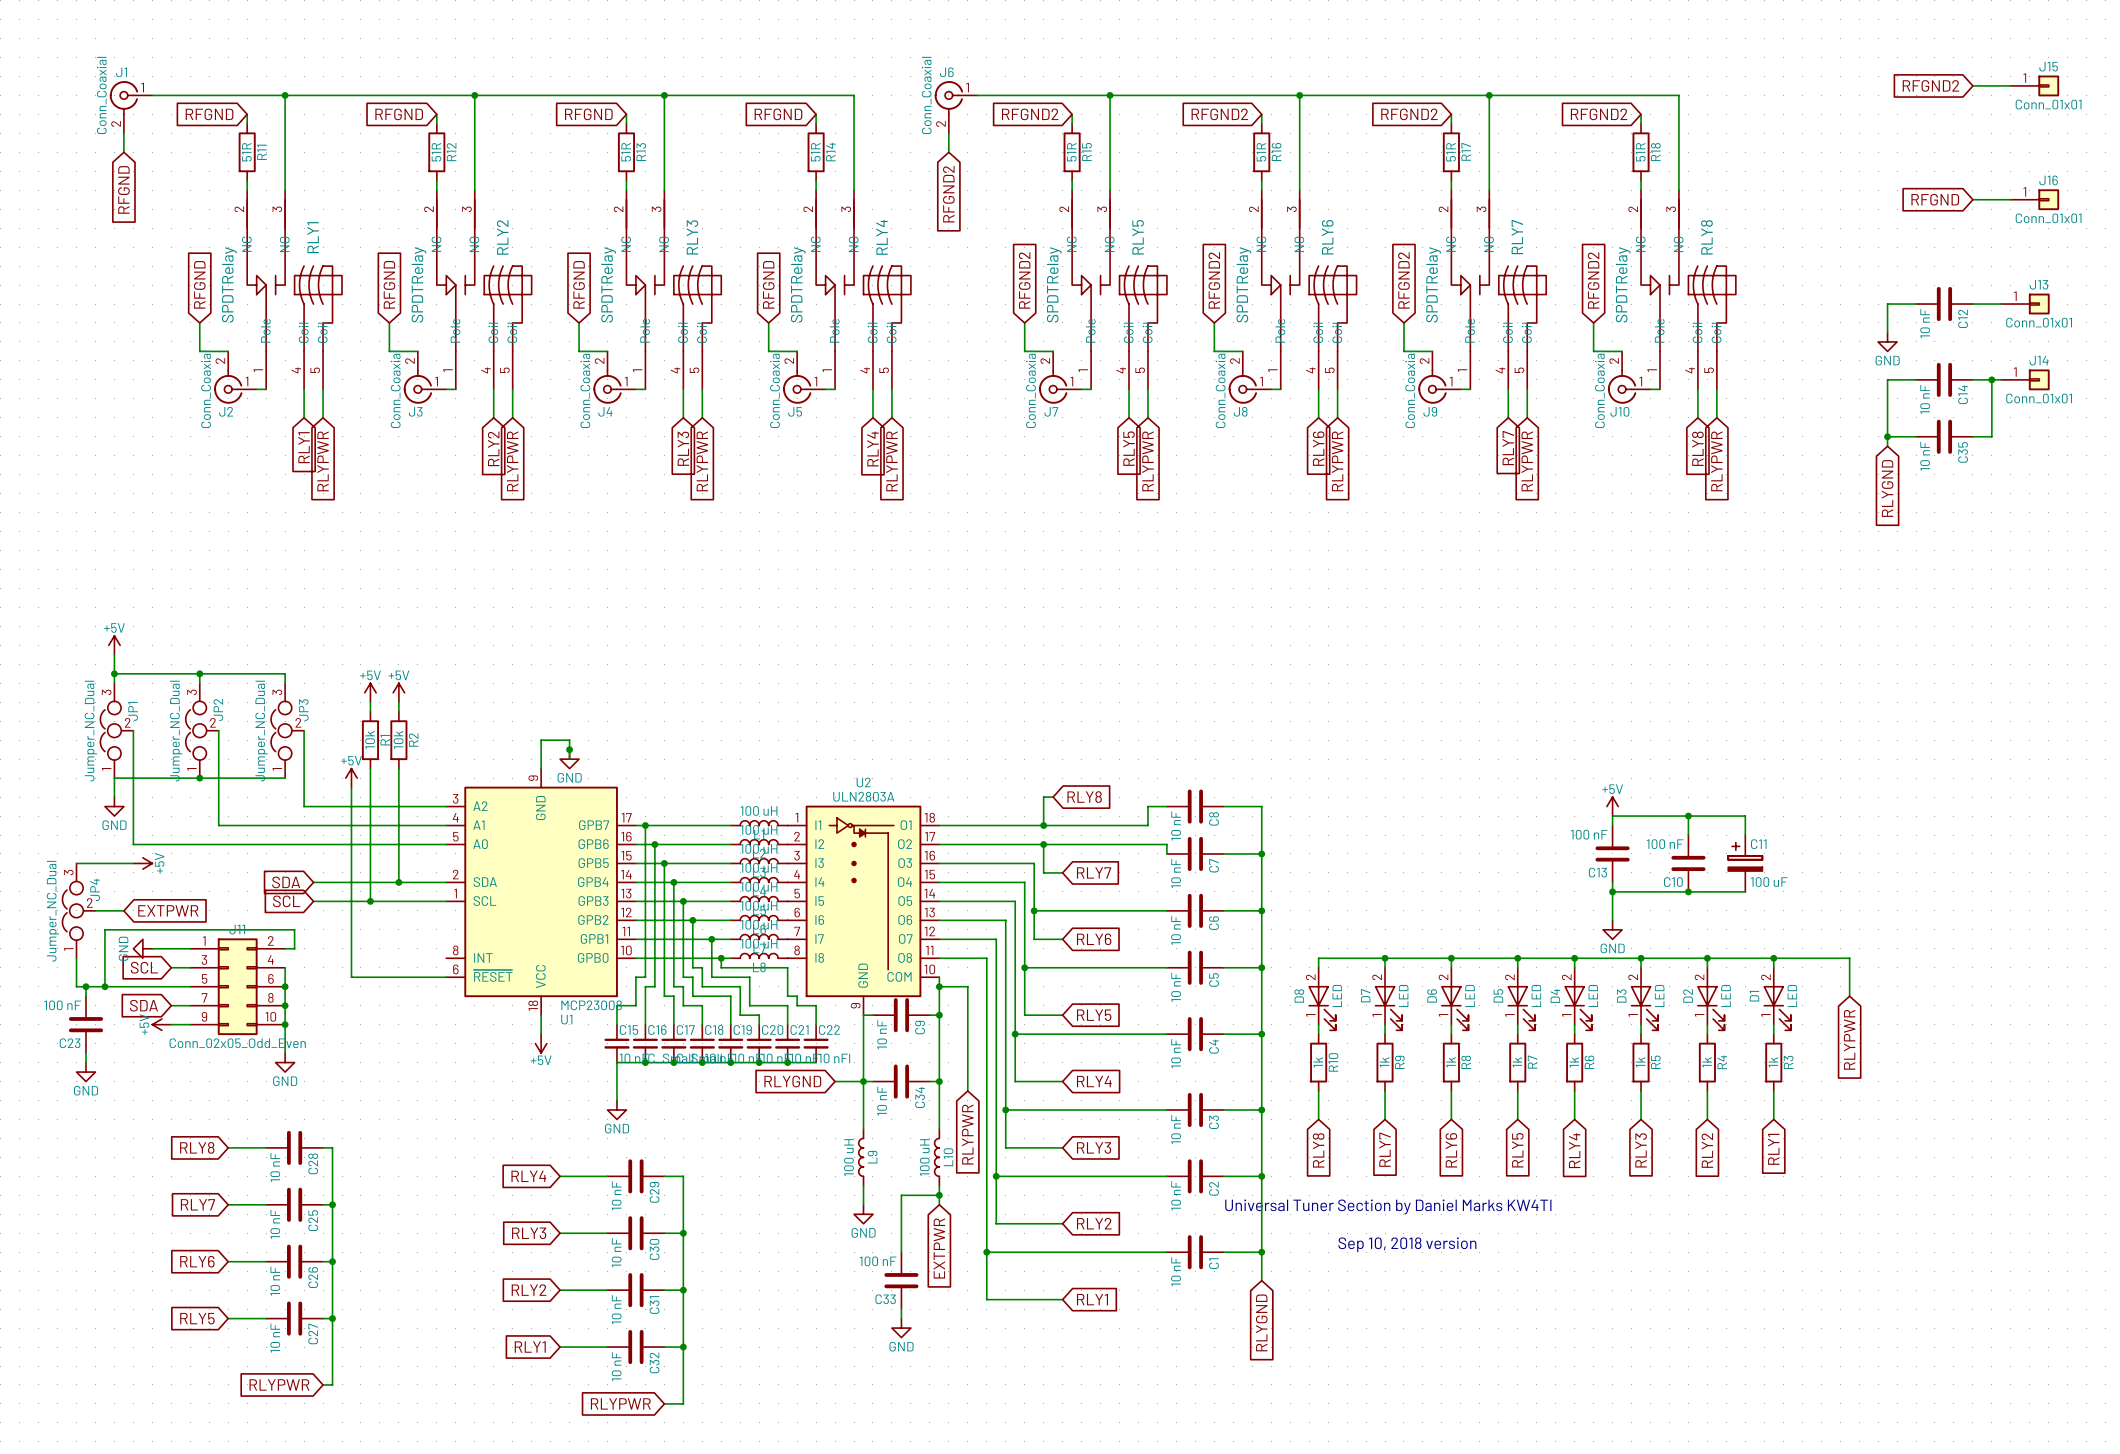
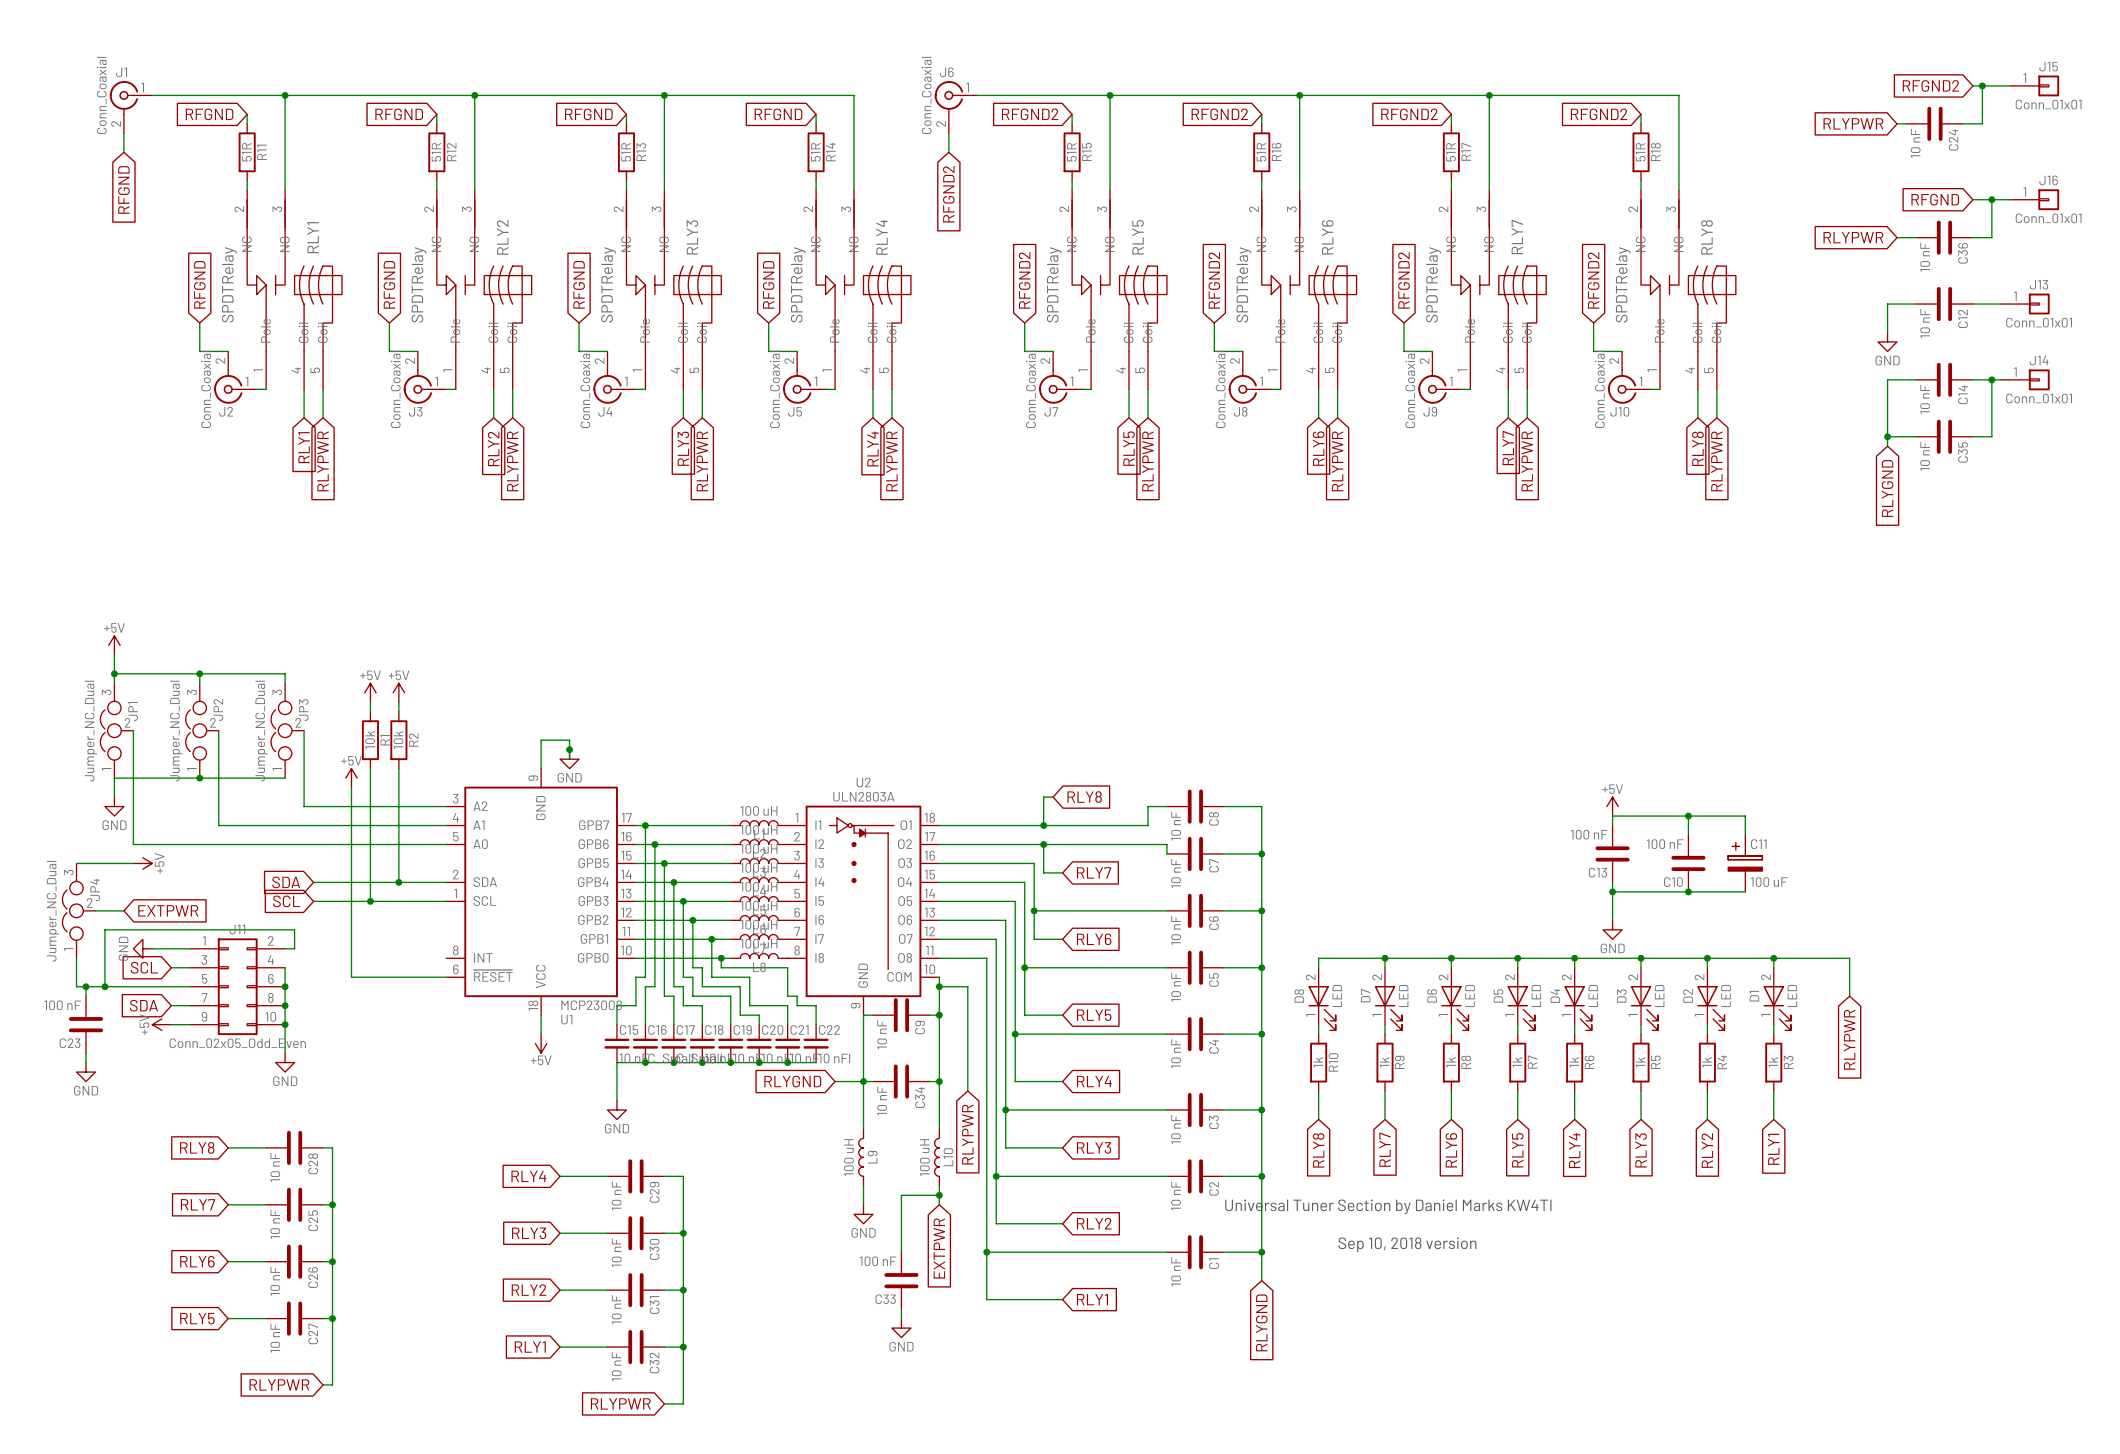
wire: none -> (1982, 85) (1982, 123) (1963, 123)
junction: none -> (1982, 85)
global label: none -> RLYPWR (1853, 123)
wire: none -> (1897, 123) (1906, 123)
C24: none -> 10 nF (1934, 123)
wire: none -> (1991, 199) (1991, 237) (1972, 237)
junction: none -> (1991, 199)
global label: none -> RLYPWR (1853, 237)
wire: none -> (1897, 237) (1916, 237)
C36: none -> 10 nF (1944, 237)

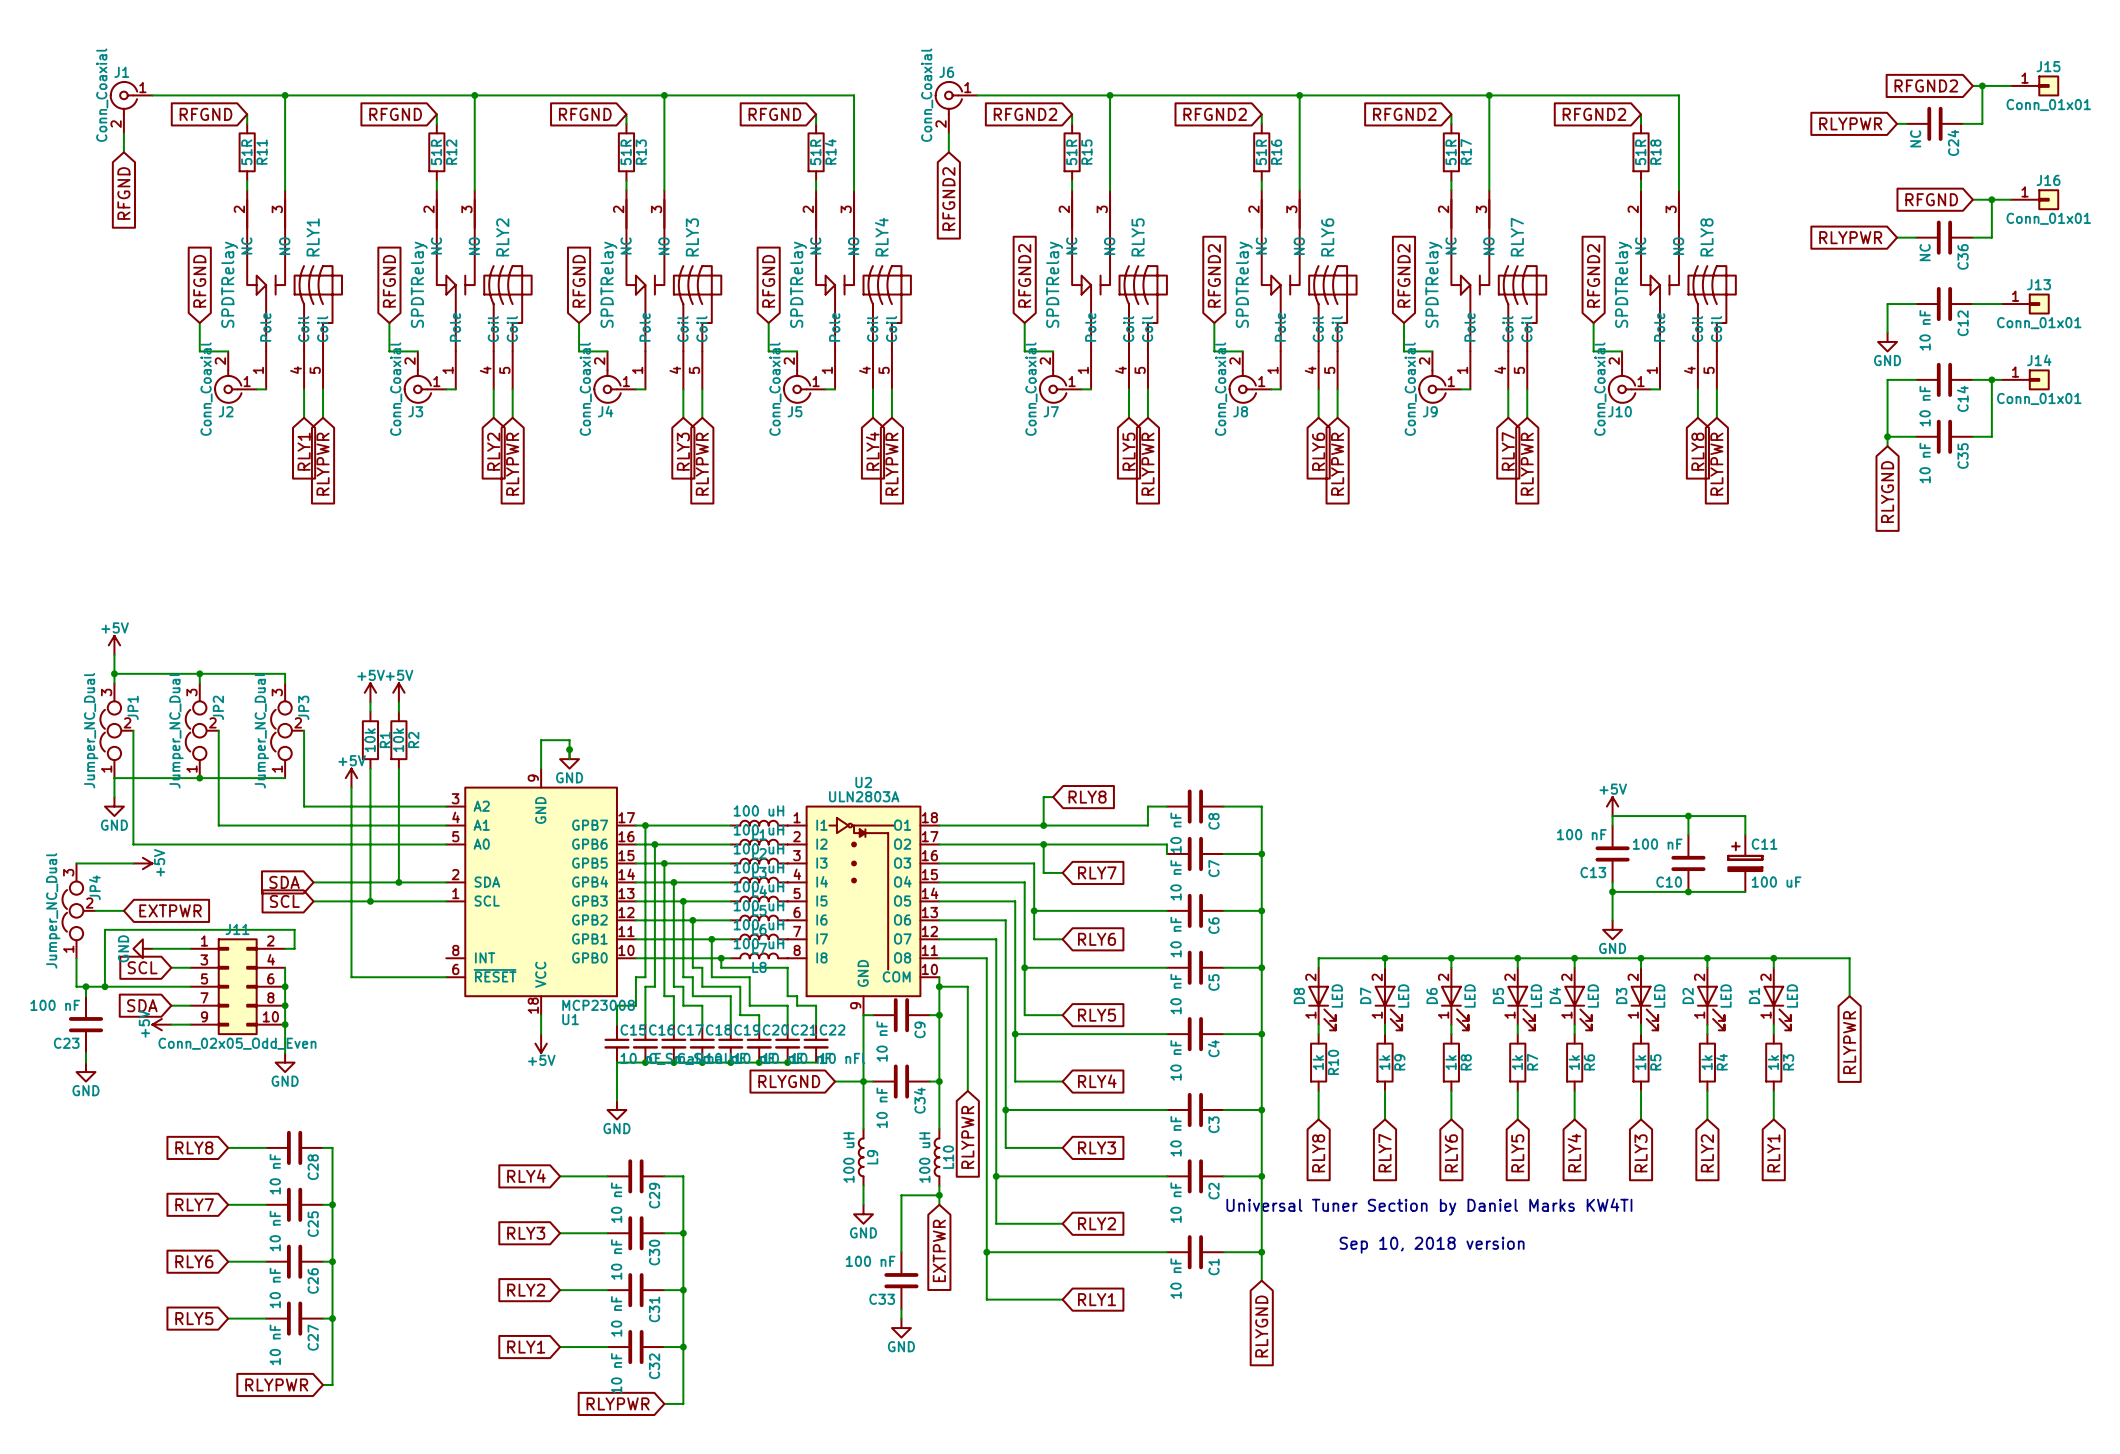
C24 value: 10 nF (1915, 143) -> NC (1915, 138)
C36 value: 10 nF (1925, 257) -> NC (1925, 252)

